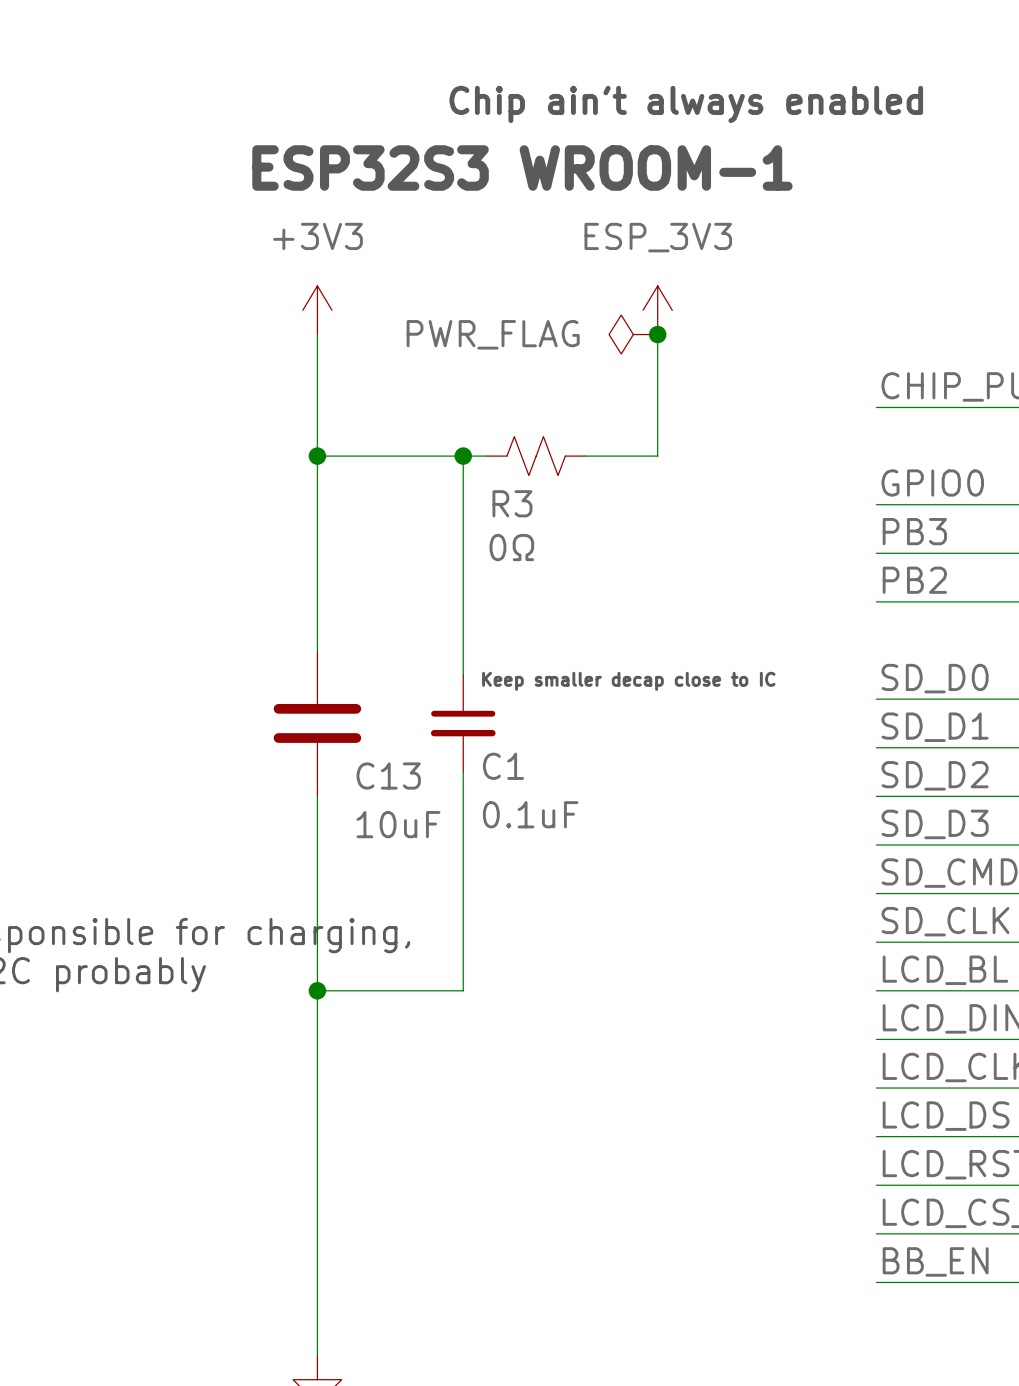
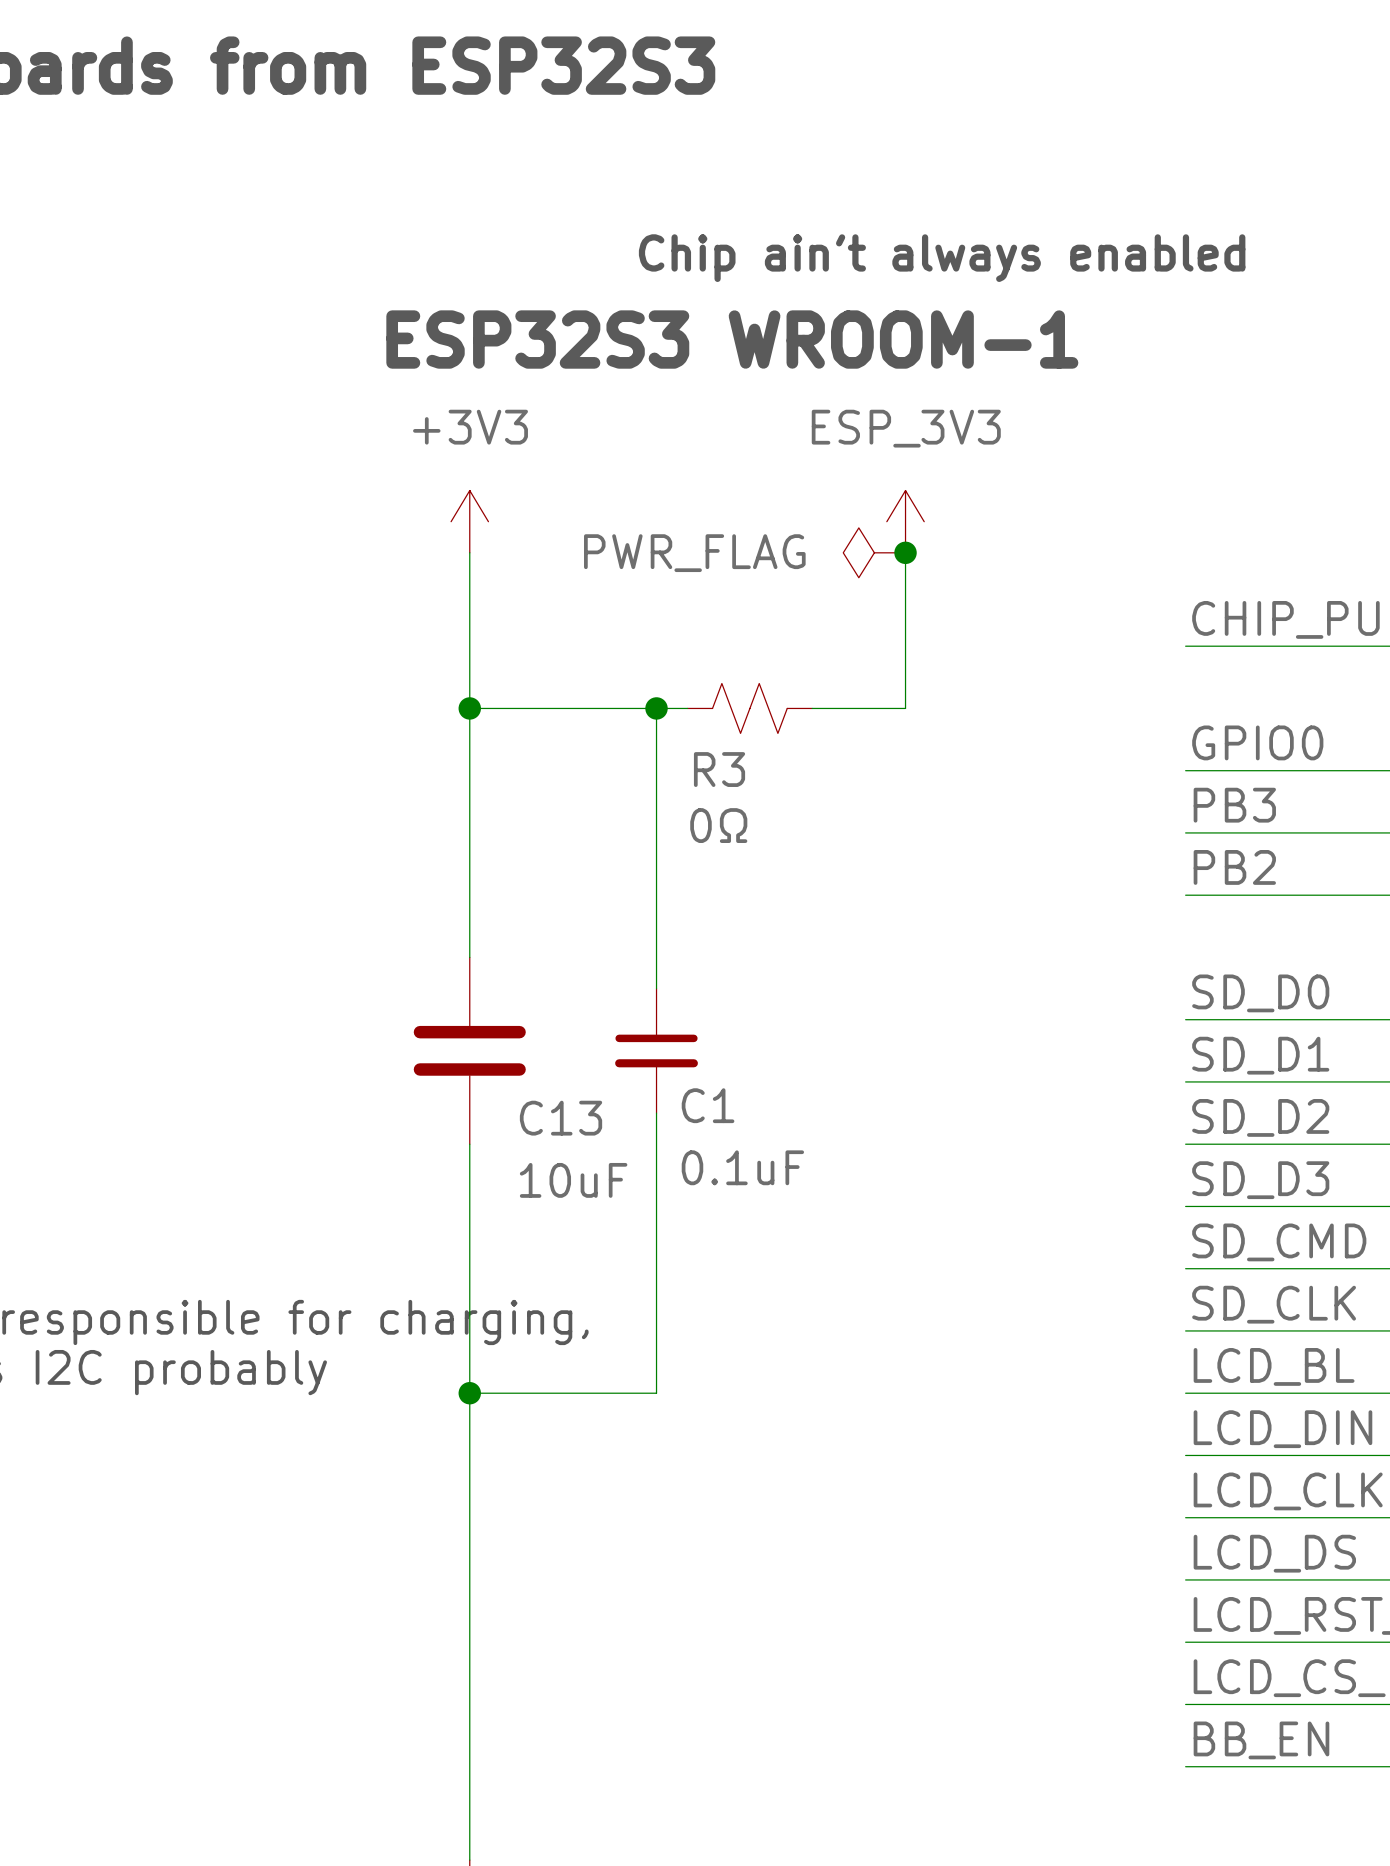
text: Keep smaller decap close to IC (628, 681) -> none

